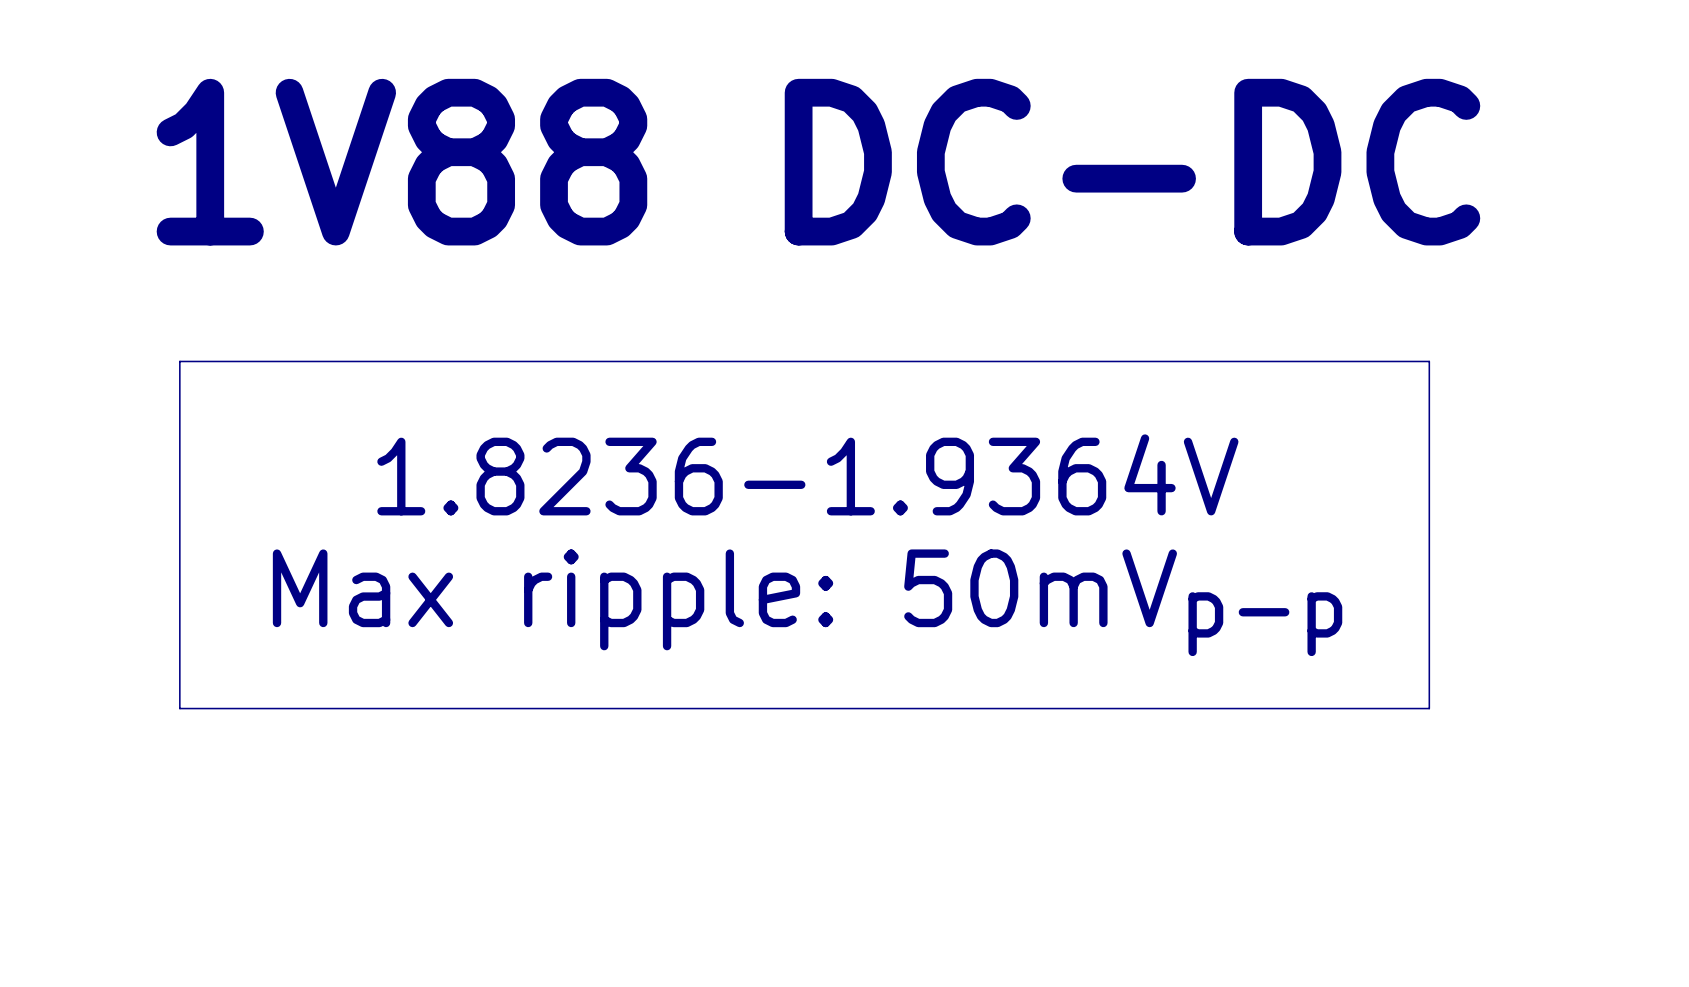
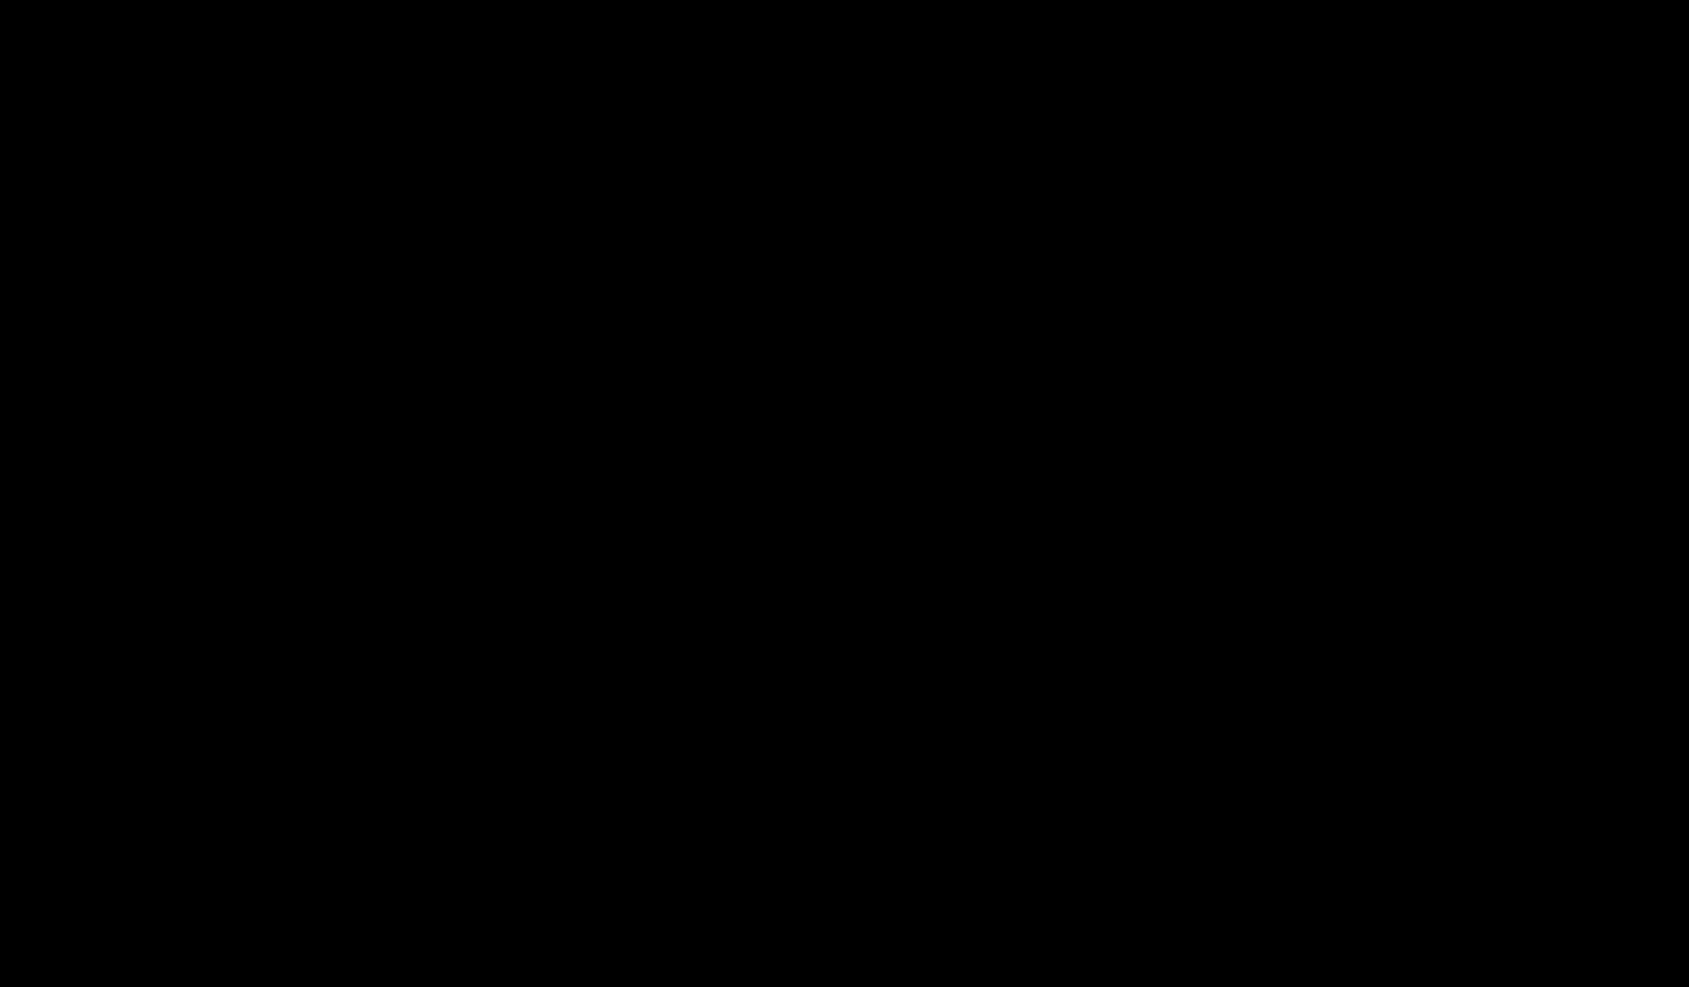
text: 1V88 DC-DC (818, 162) -> none
line: (179, 361) (1429, 361) (1429, 708) (179, 708) (179, 361) -> none
text: 1.8236-1.9364V (807, 474) -> none
text: Max ripple: 50mVp-p (807, 602) -> none

